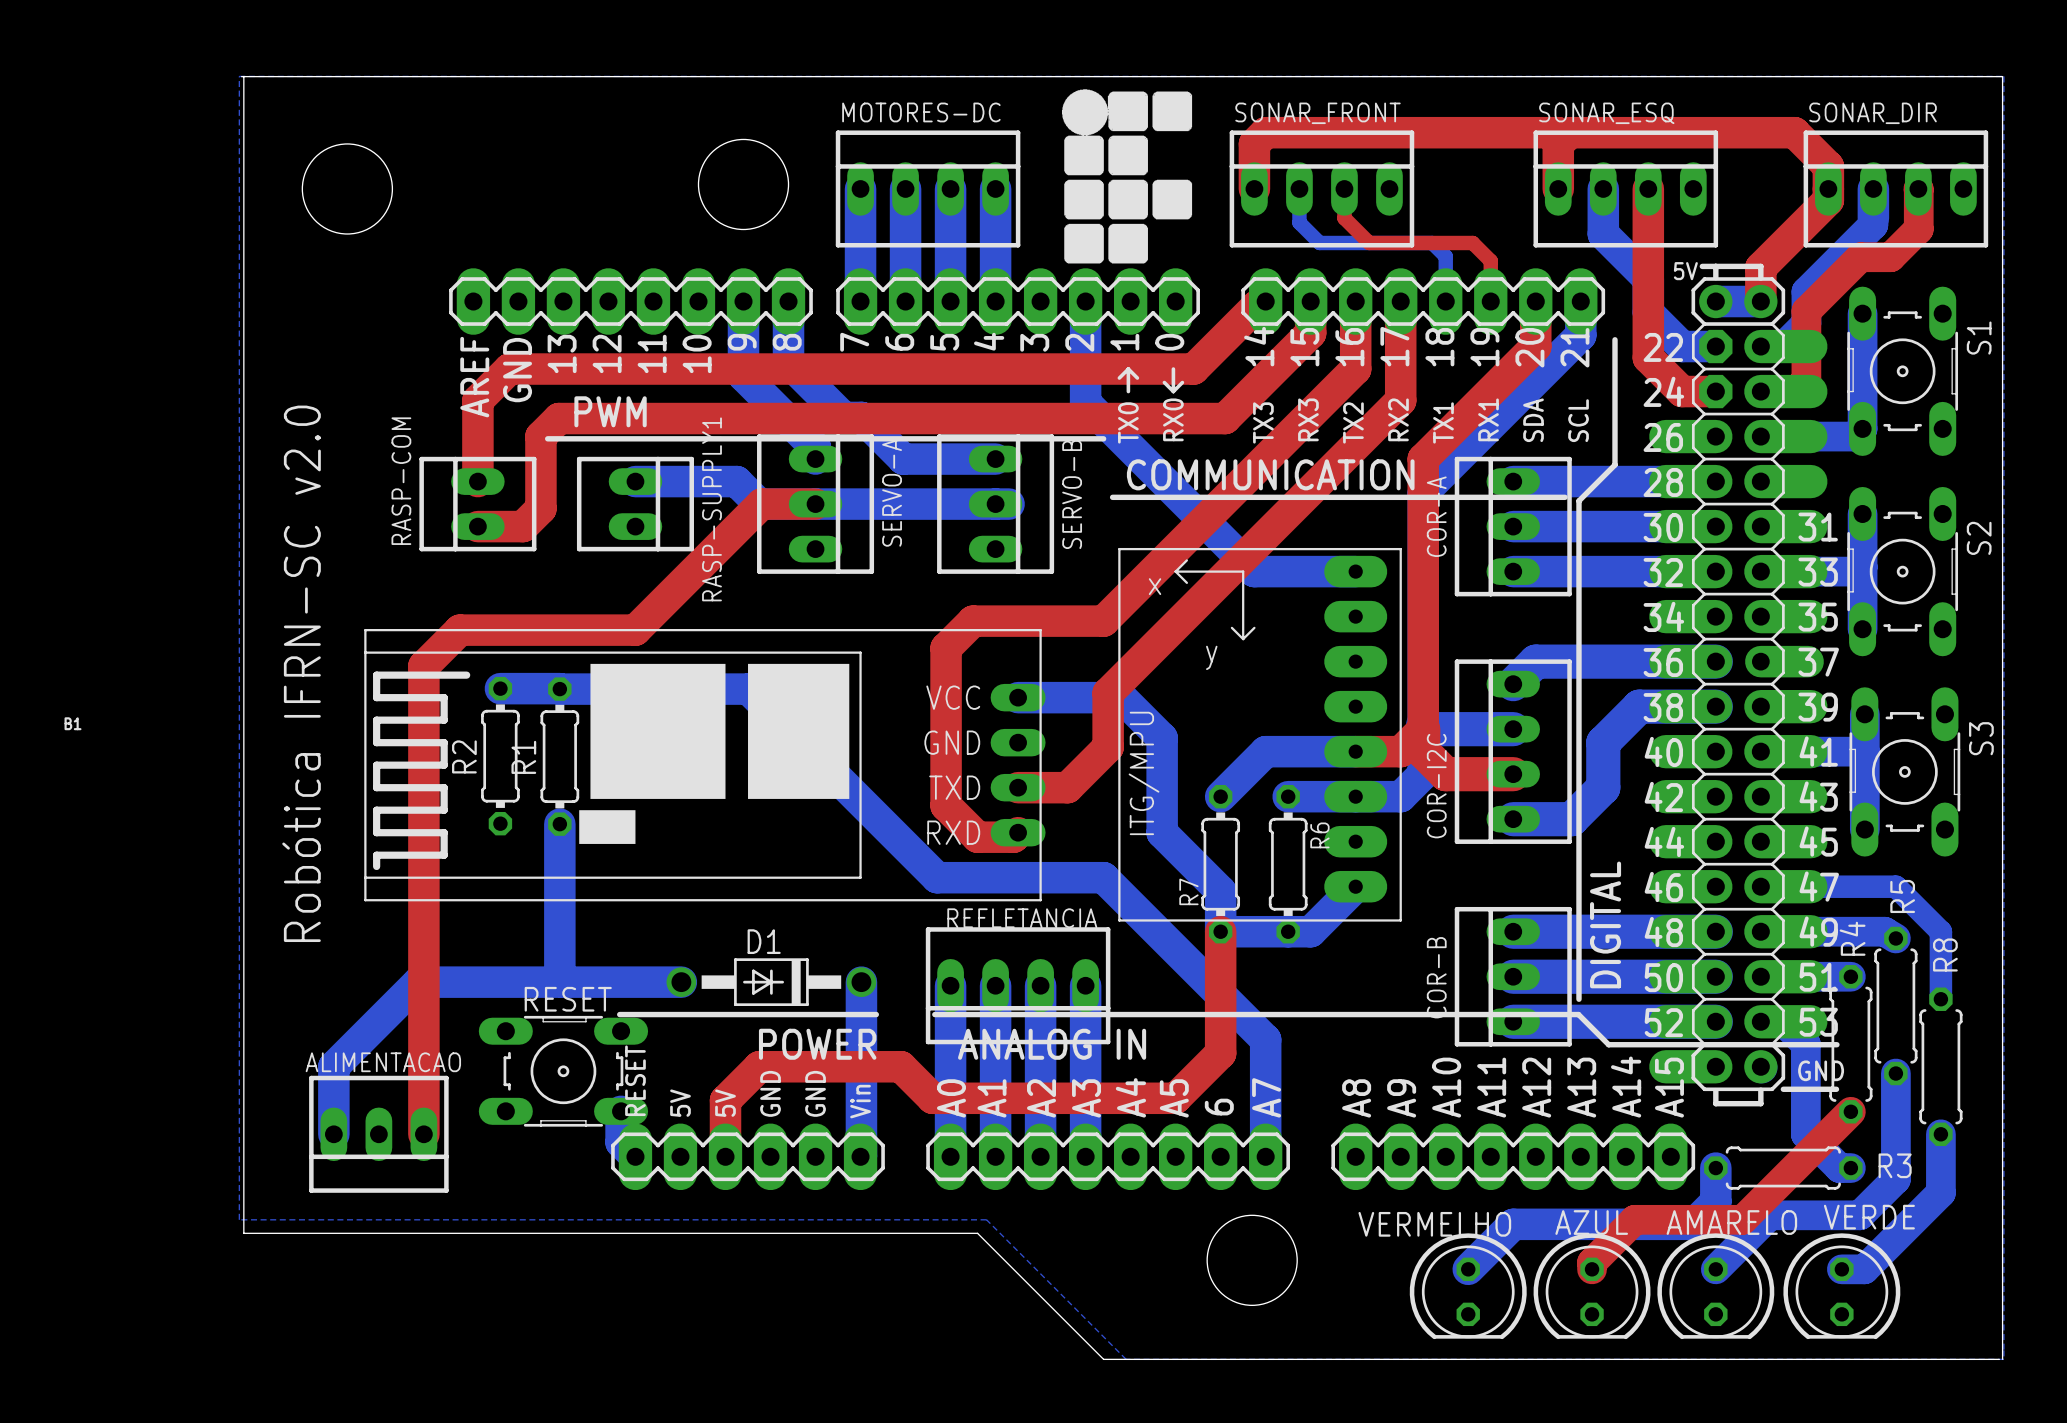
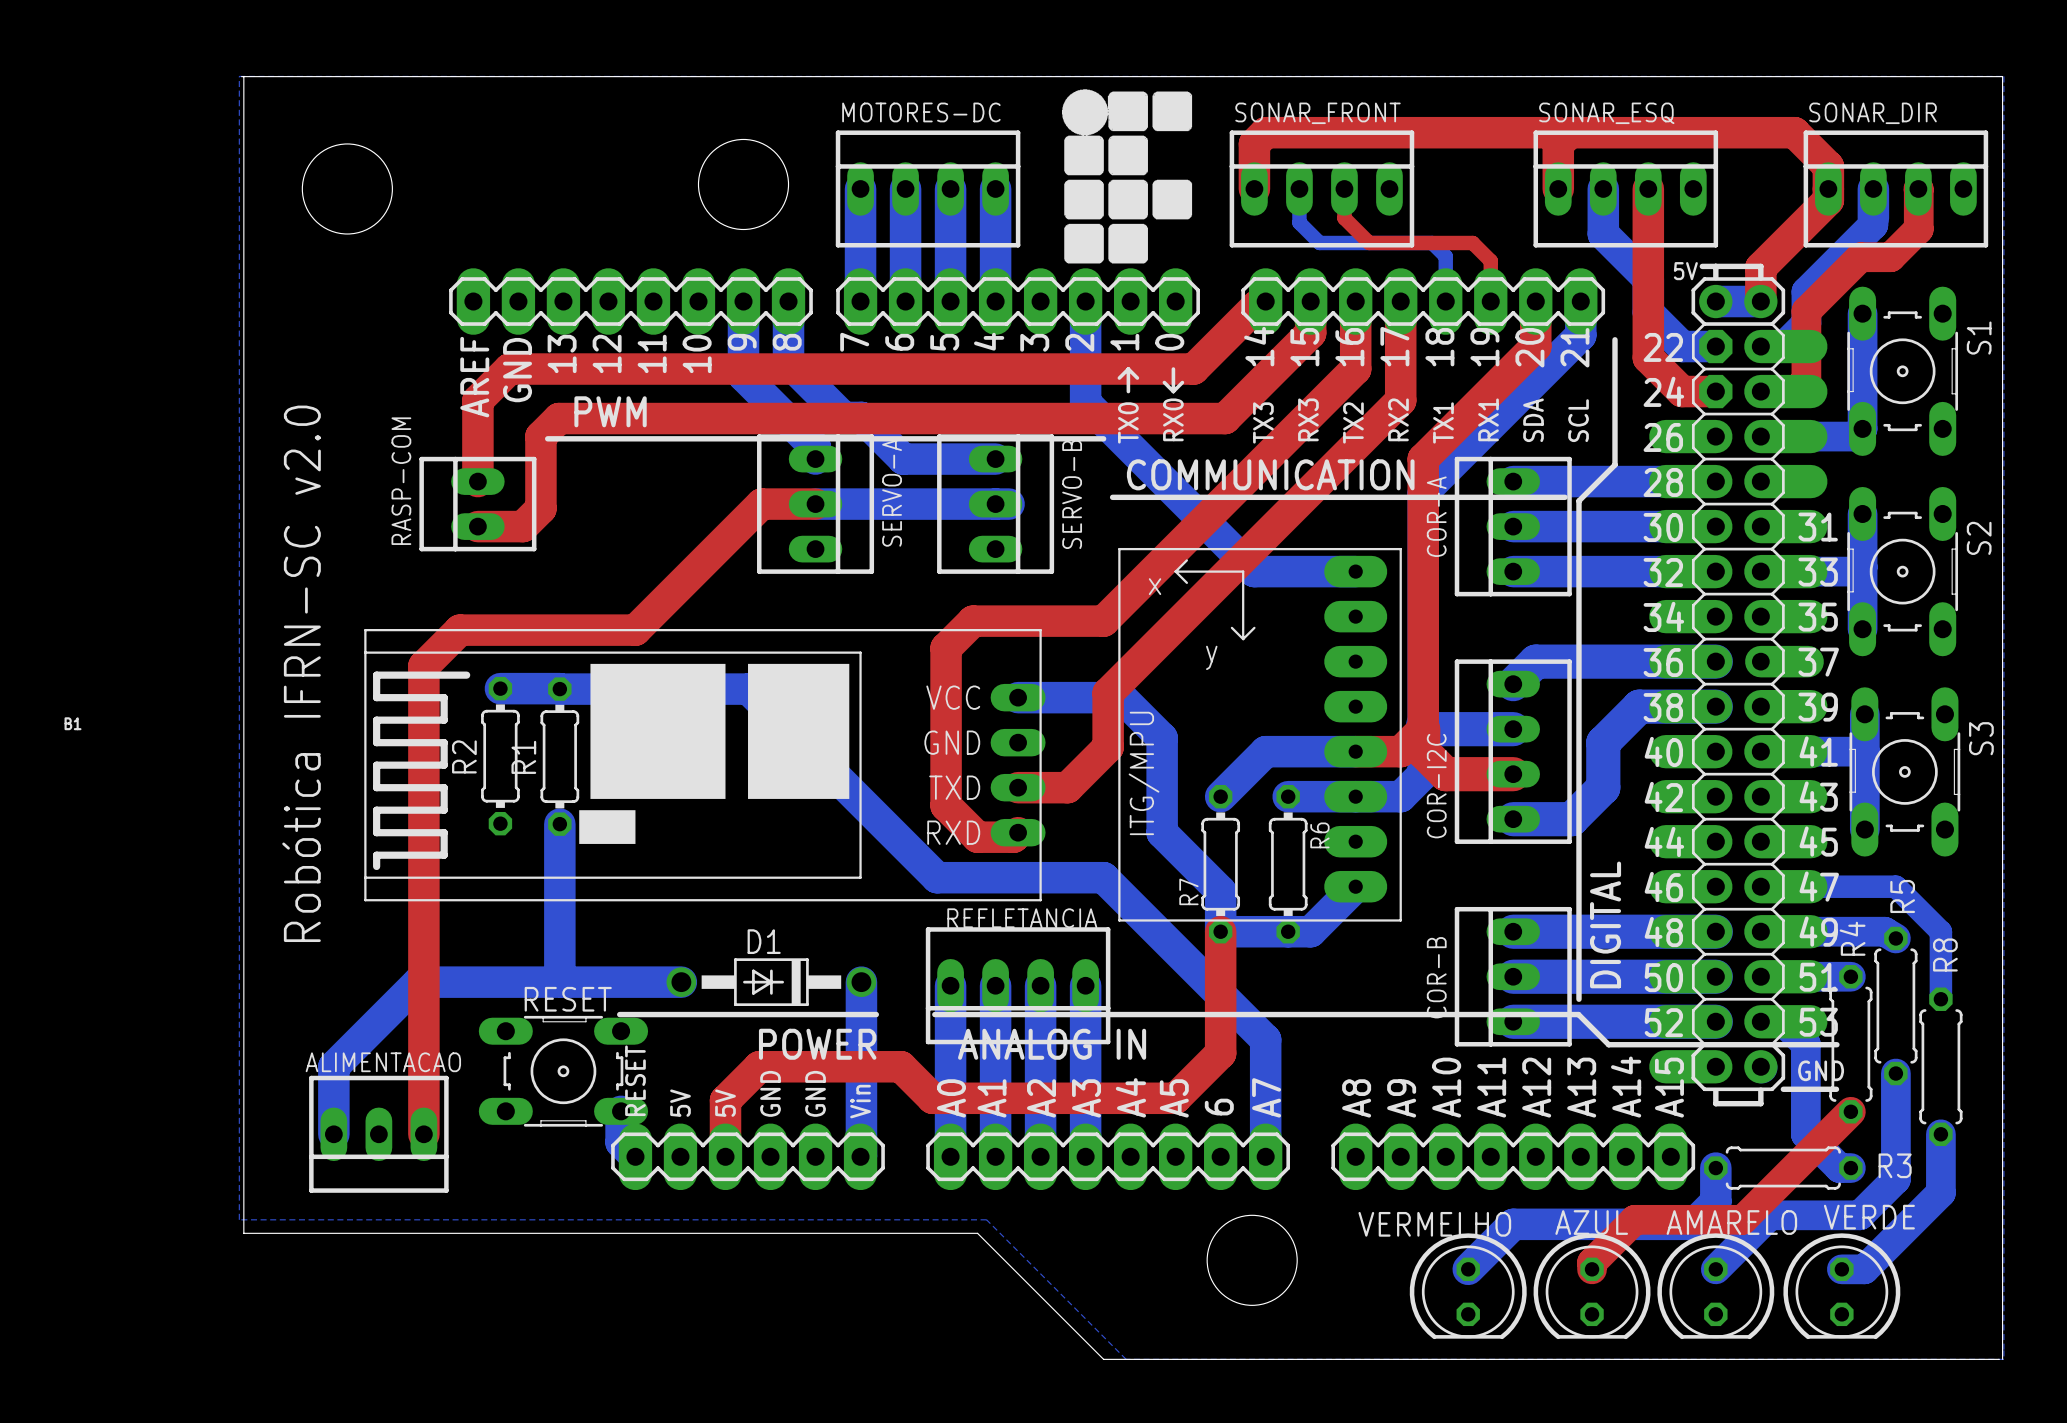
bottom track: (635, 481) (736, 481) (759, 504) (815, 504) -> none
RASP-SUPPLY1: (635, 504) -> none

